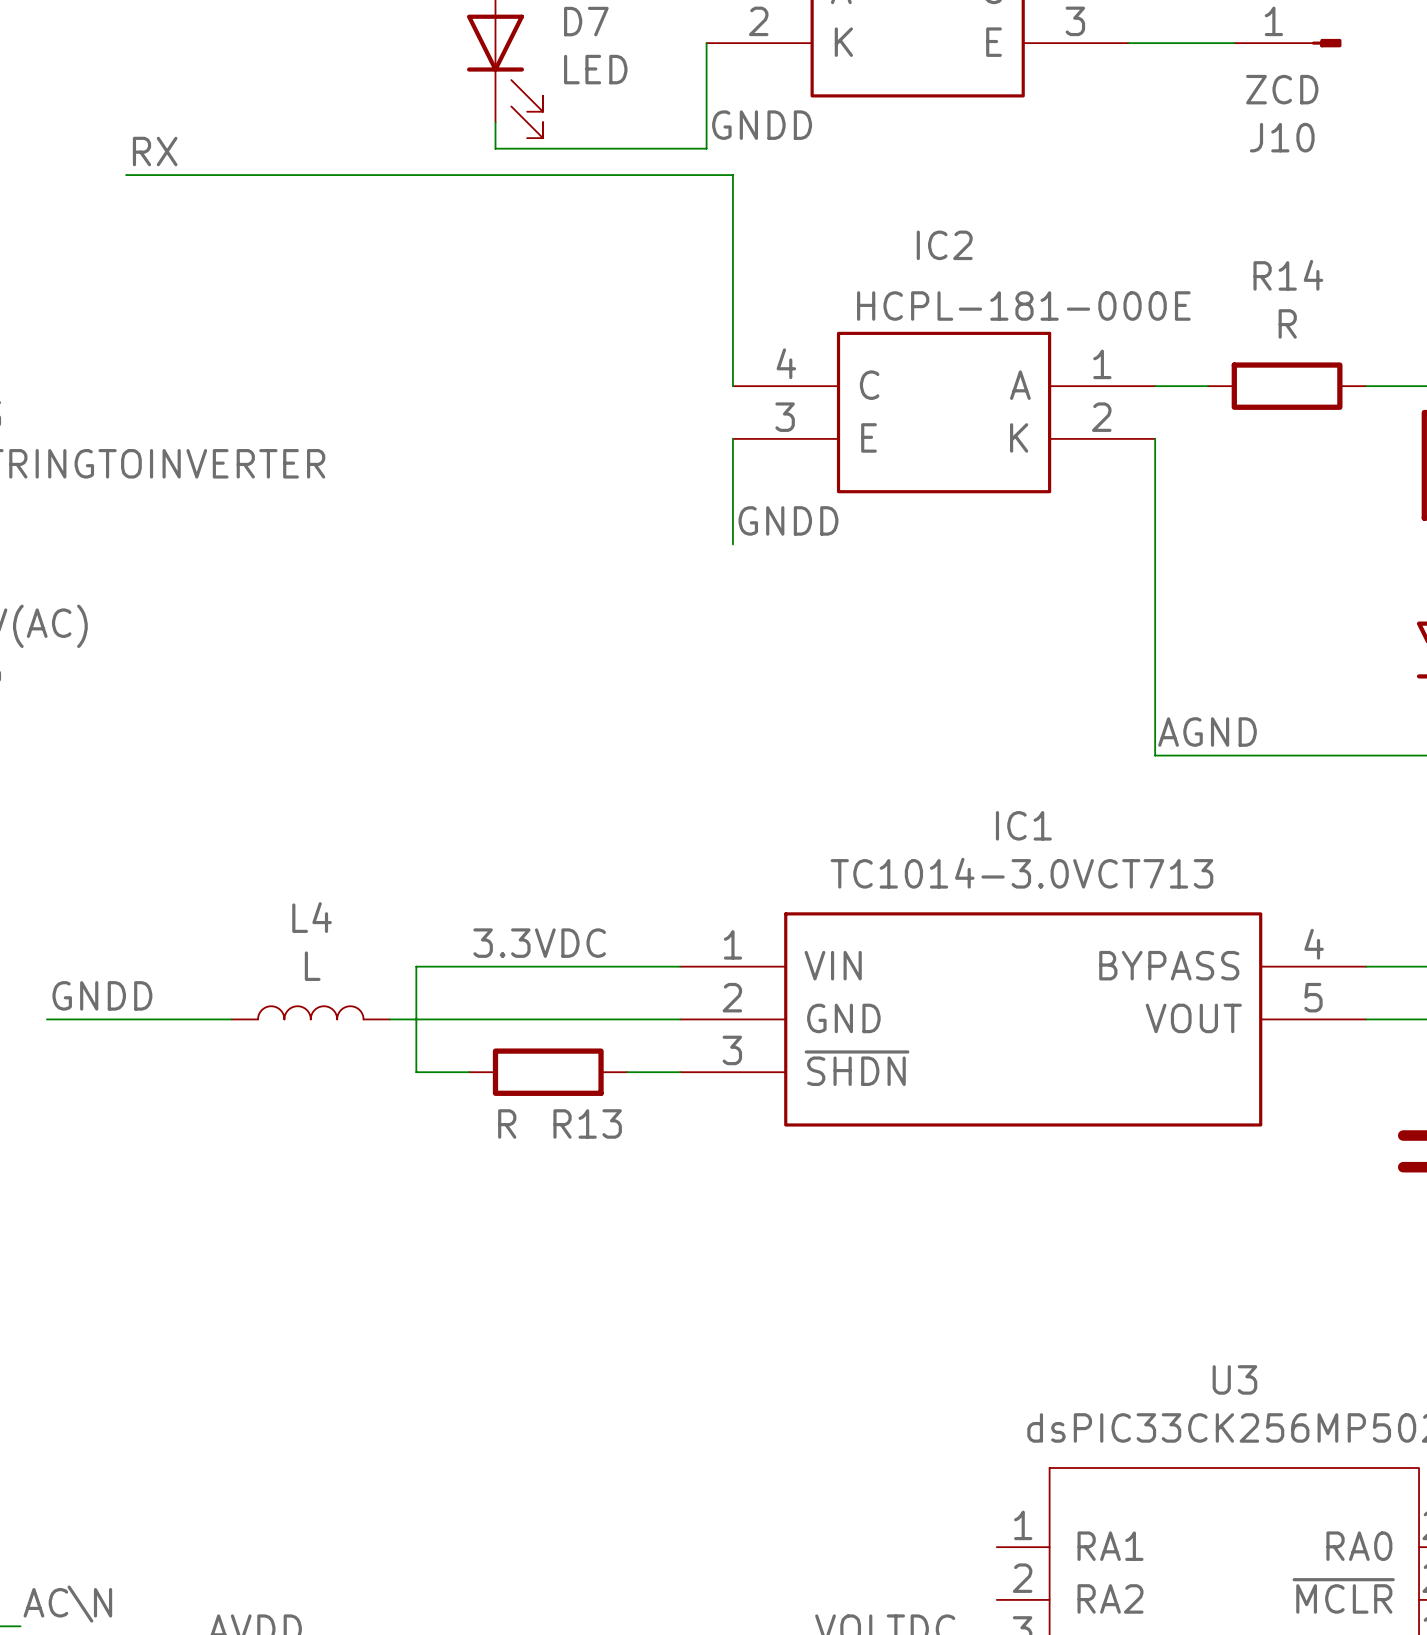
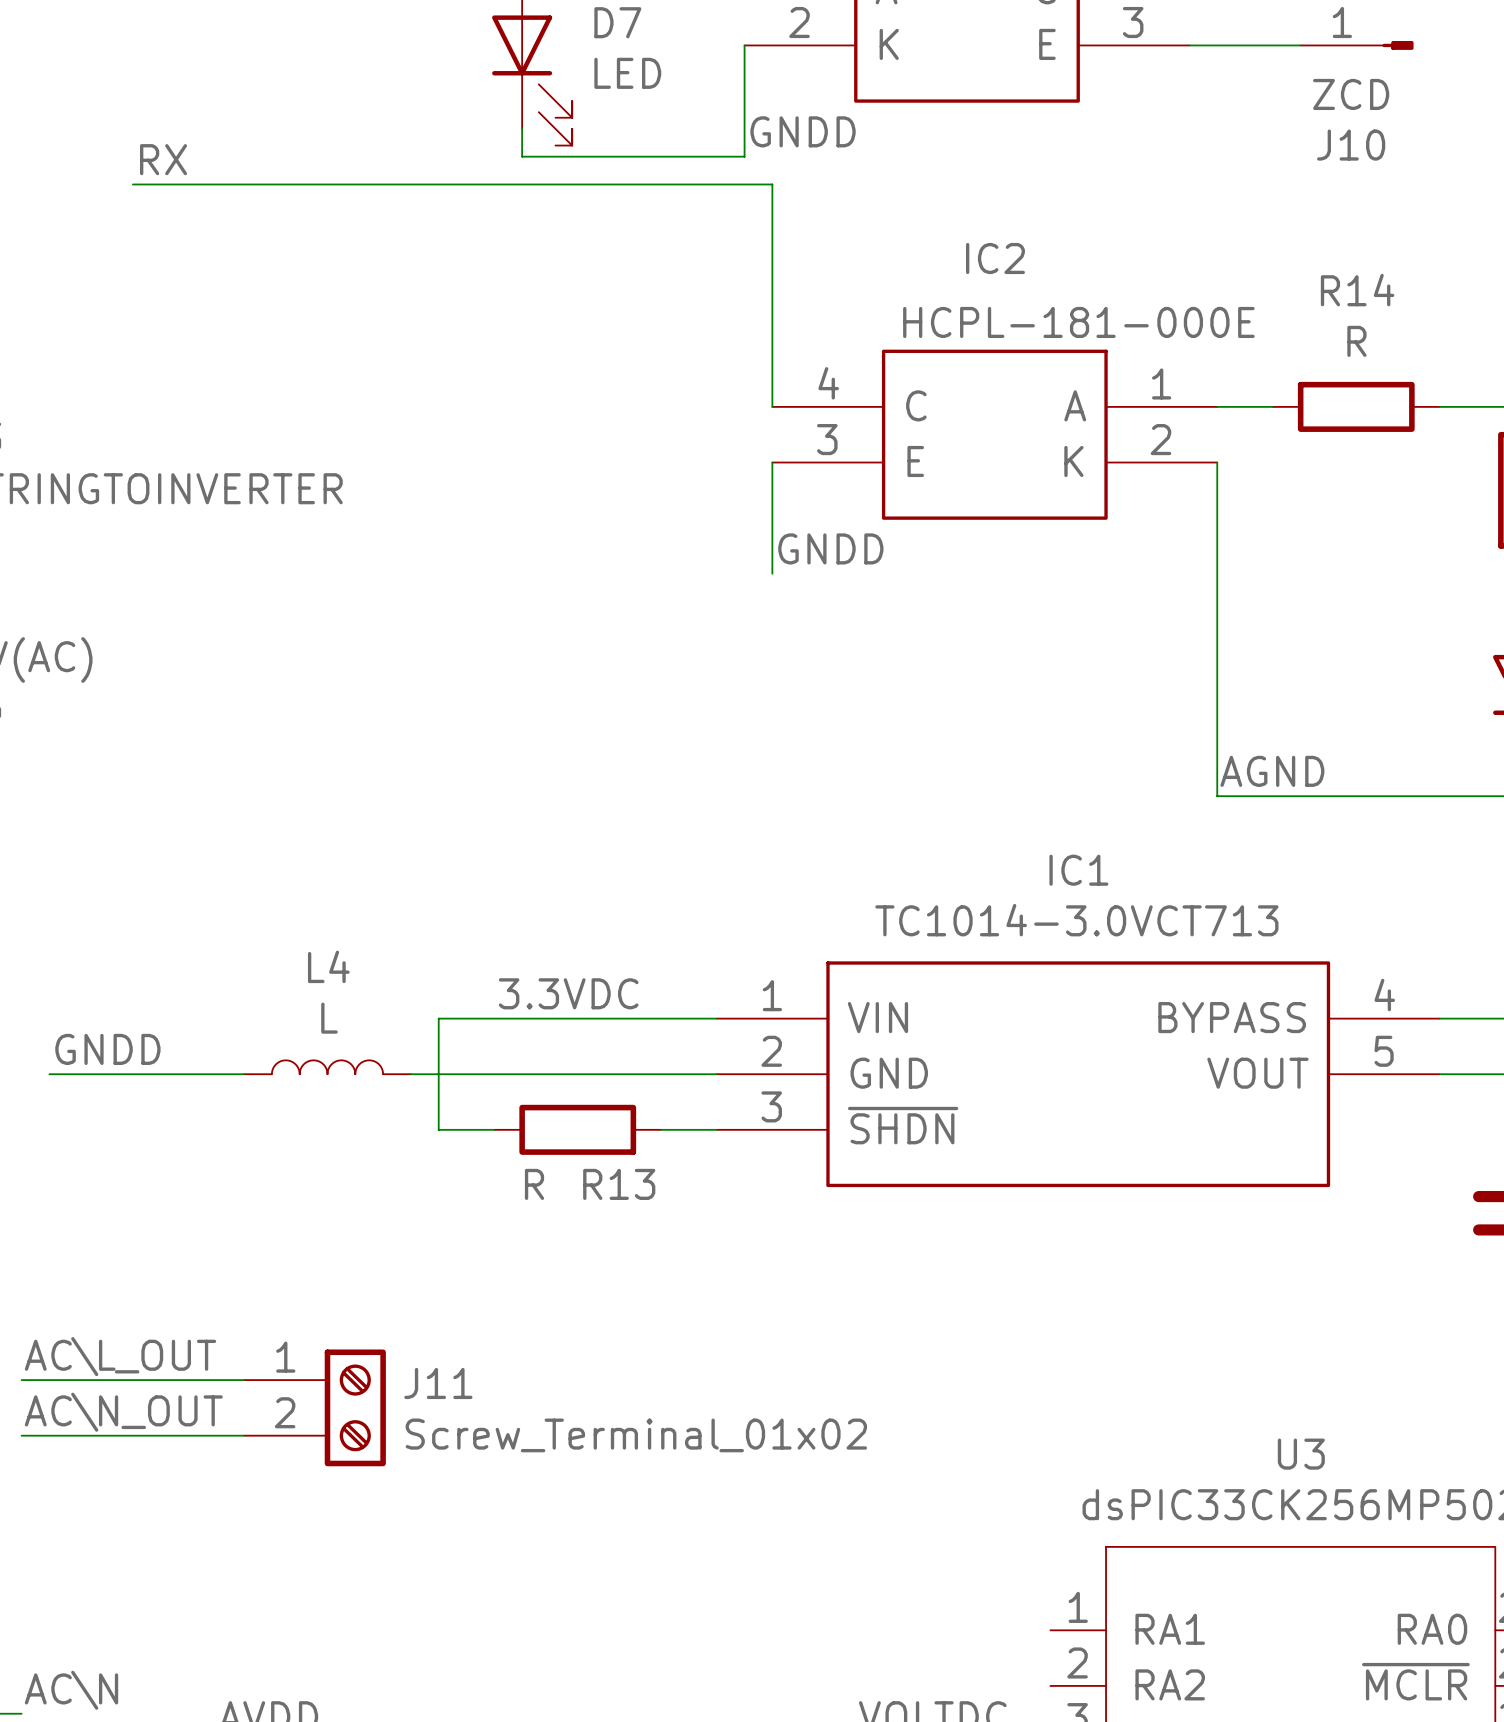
label: none -> AC\L_OUT (120, 1356)
wire: none -> (21, 1380) (244, 1380)
J11: none -> Screw_Terminal_01x02 (314, 1407)
label: none -> AC\N_OUT (123, 1412)
wire: none -> (21, 1435) (244, 1435)

